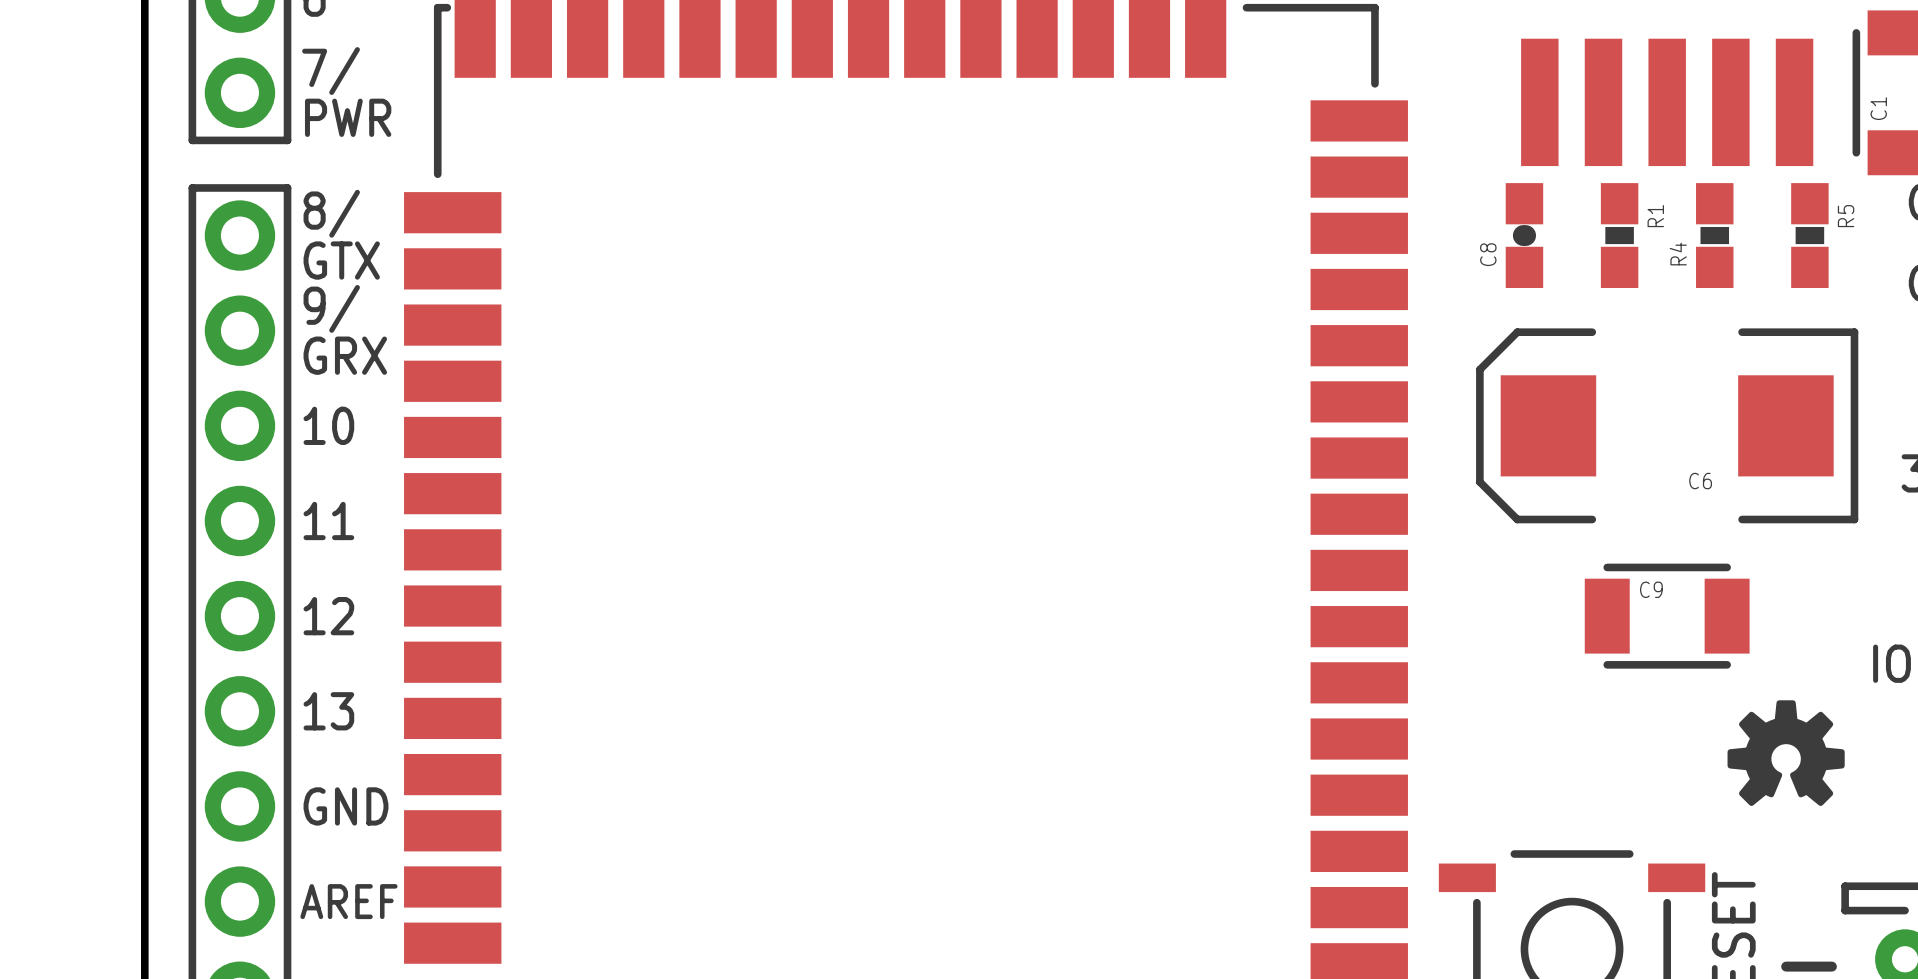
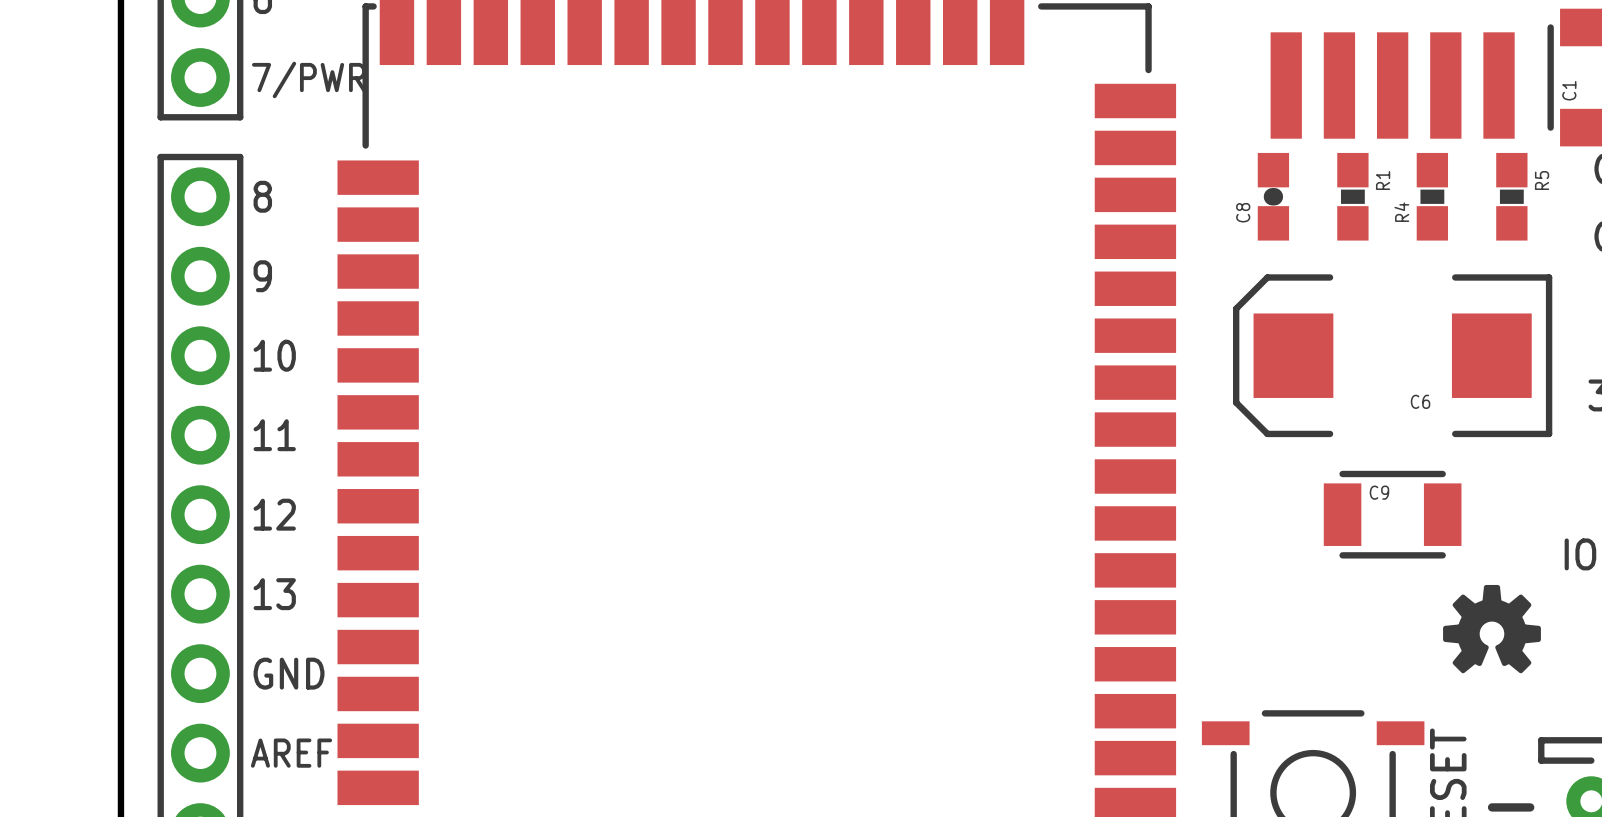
text: 7/ (331, 71) -> none
text: PWR (348, 117) -> 7/PWR (308, 79)
text: 8/ (331, 213) -> 8 (262, 196)
text: GTX (341, 260) -> none
text: 9/ (331, 308) -> 9 (262, 276)
text: GRX (345, 355) -> none

